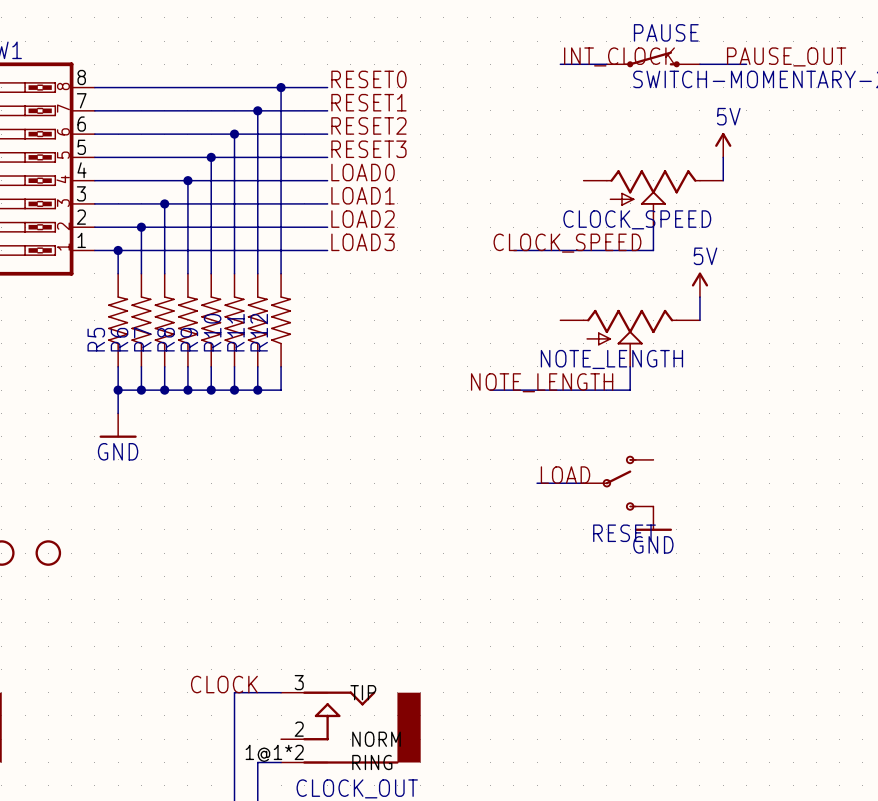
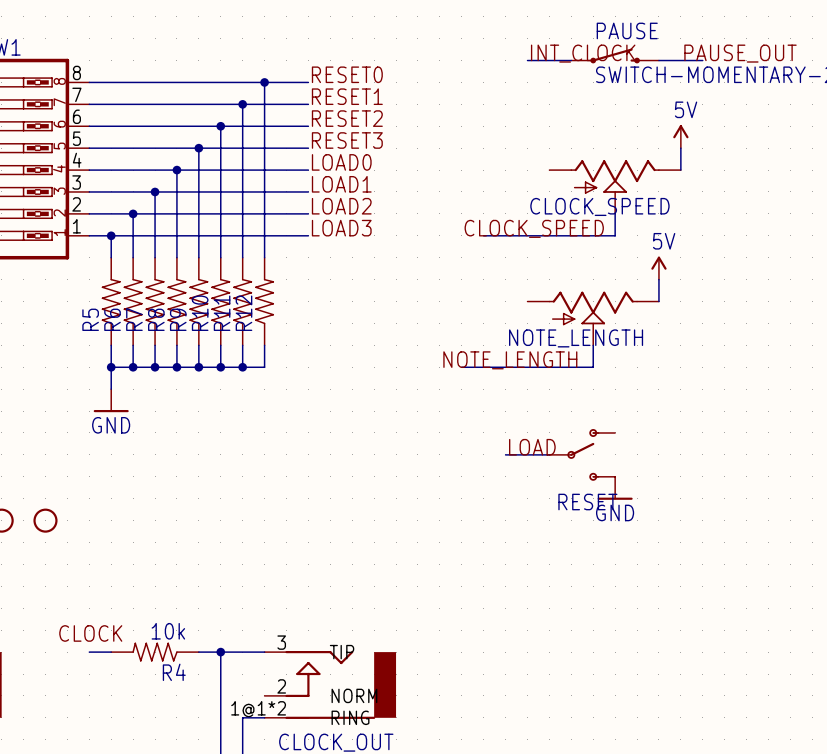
label position: CLOCK (224, 684) -> CLOCK (90, 633)
wire: none -> (89, 652) (111, 652)
R4: none -> 10k (155, 652)
wire: none -> (198, 652) (220, 652)
junction: none -> (220, 652)

